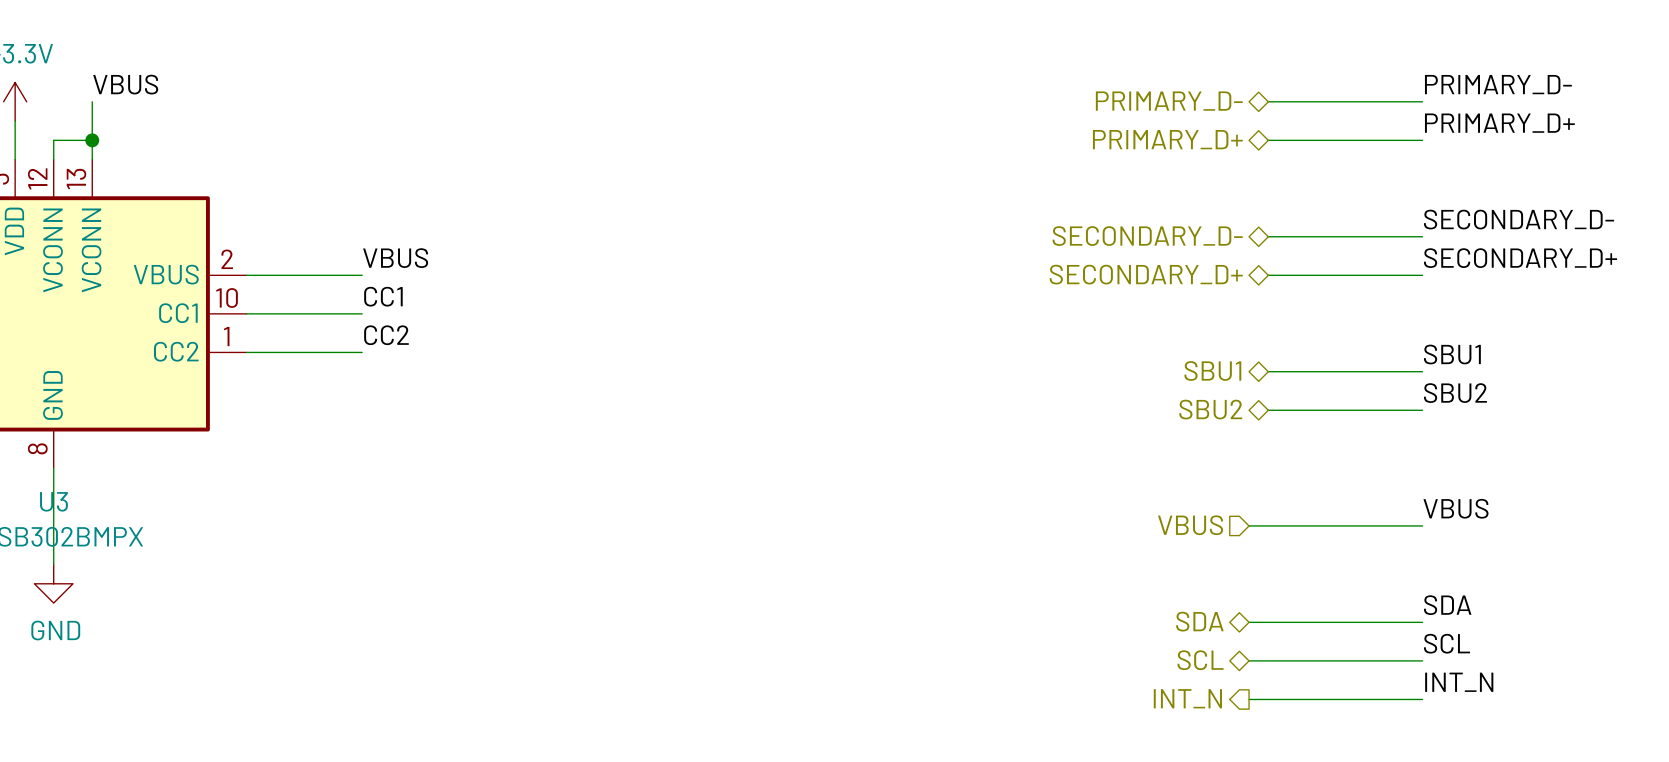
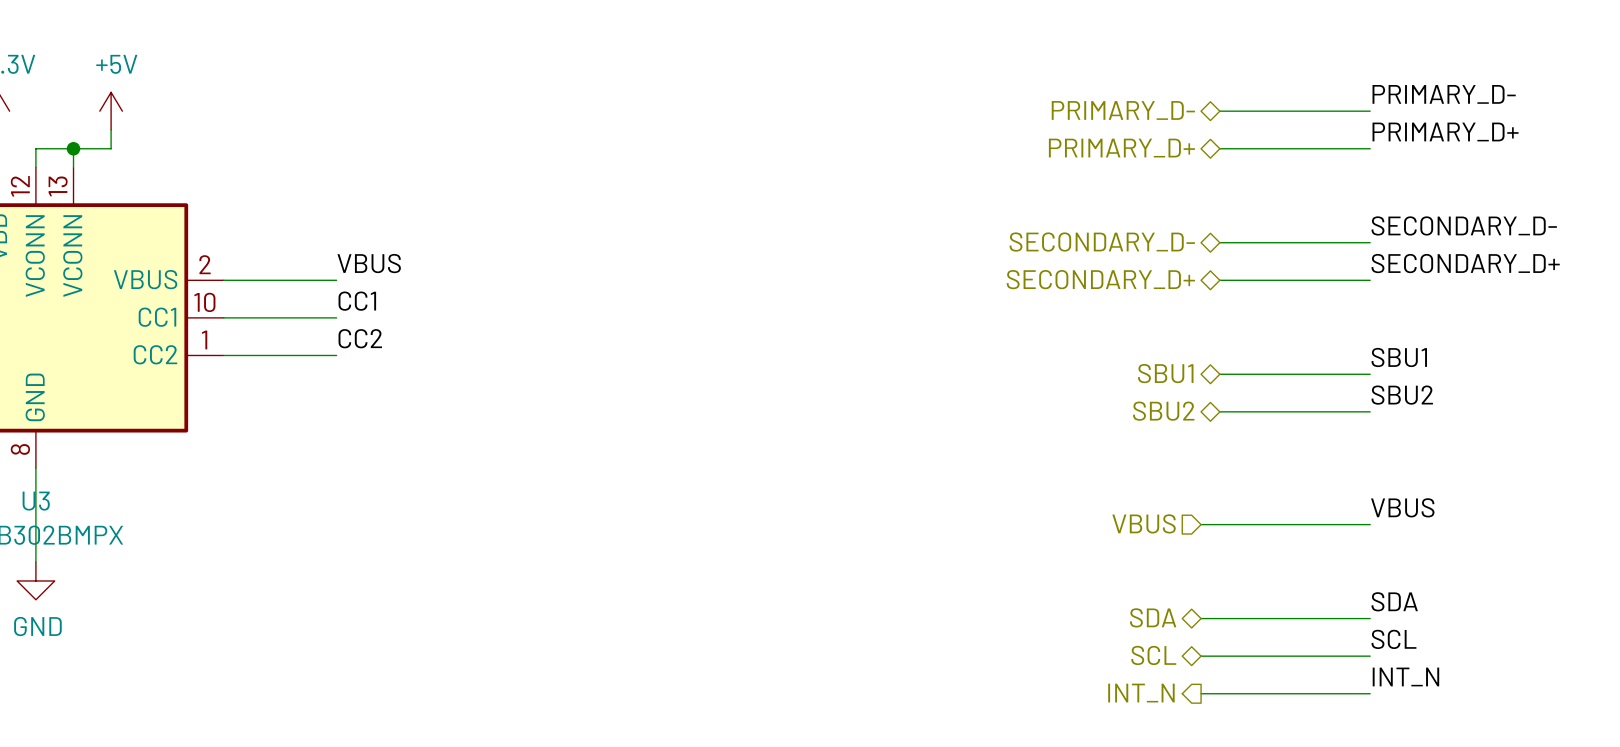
label: VBUS (125, 84) -> none
wire: (92, 101) (92, 140) -> (111, 129) (111, 148) (73, 148)
power symbol: none -> +5V (111, 111)

